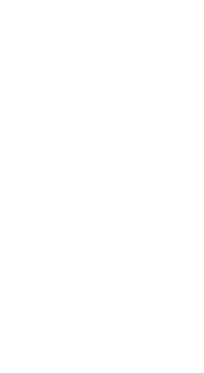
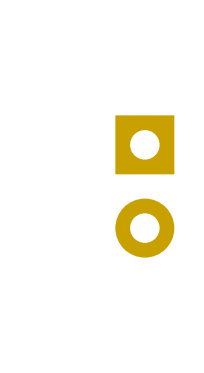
part: none -> (144, 186)

